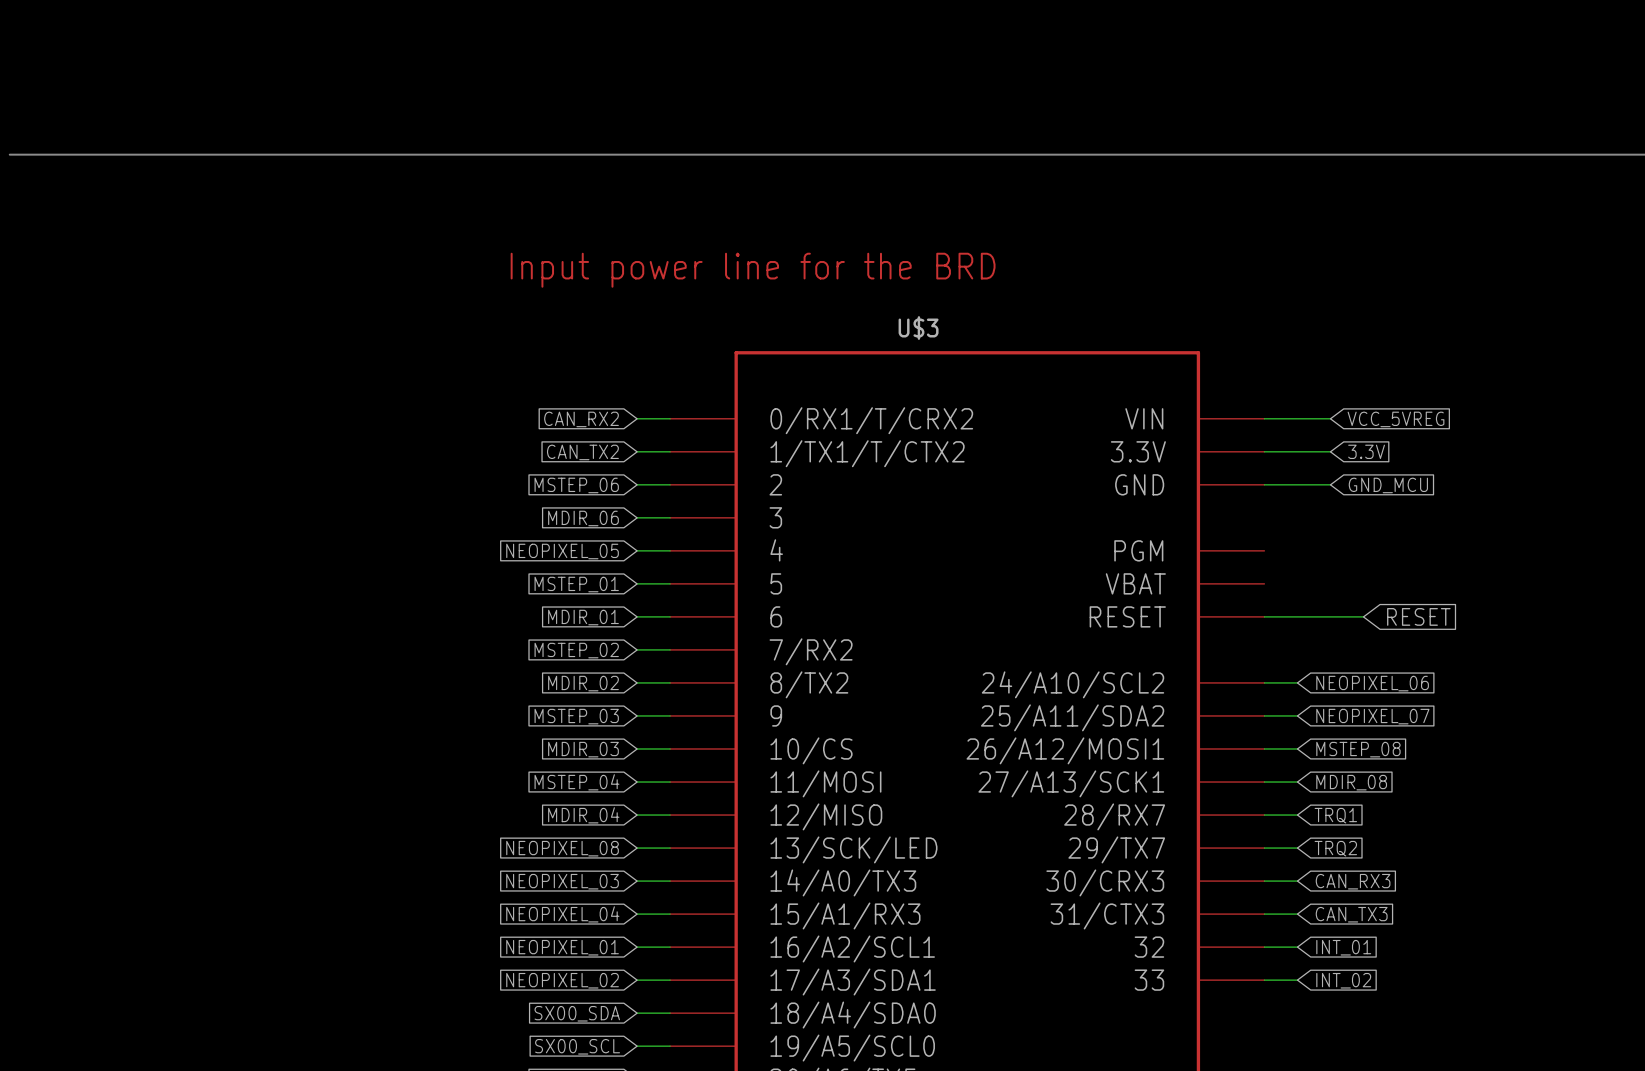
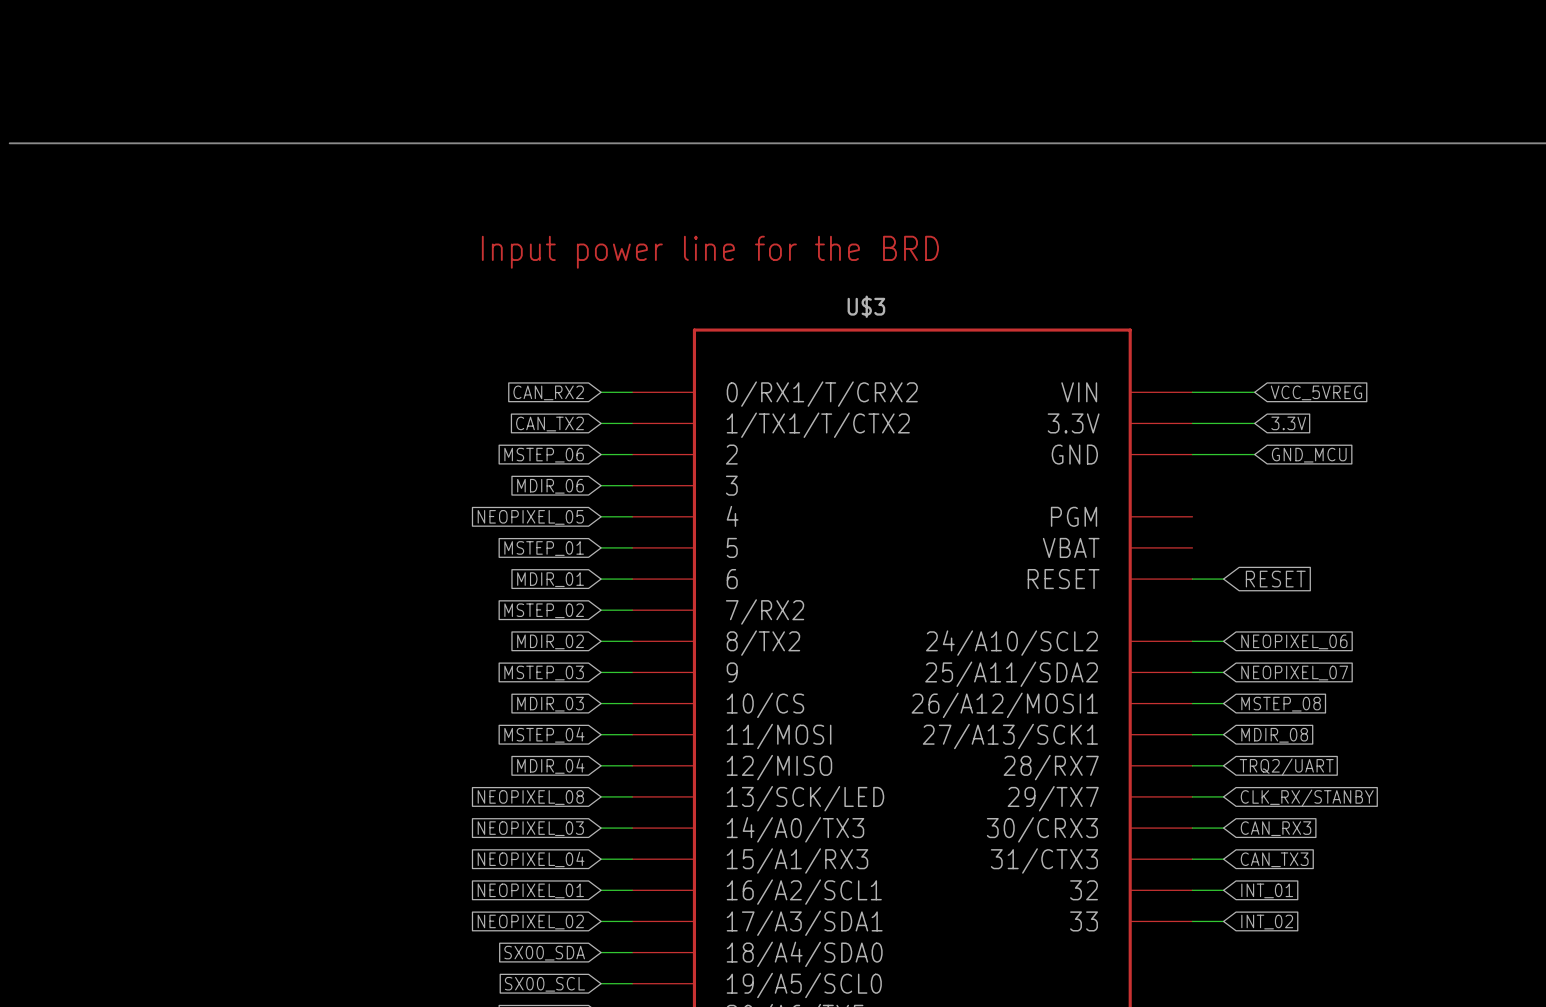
wire: (1297, 616) (1363, 616) -> none
global label position: RESET (1418, 616) -> RESET (1275, 579)
global label: TRQ1 (1335, 815) -> TRQ2/UART (1286, 767)
global label: TRQ2 (1335, 848) -> CLK_RX/STANBY (1307, 798)

